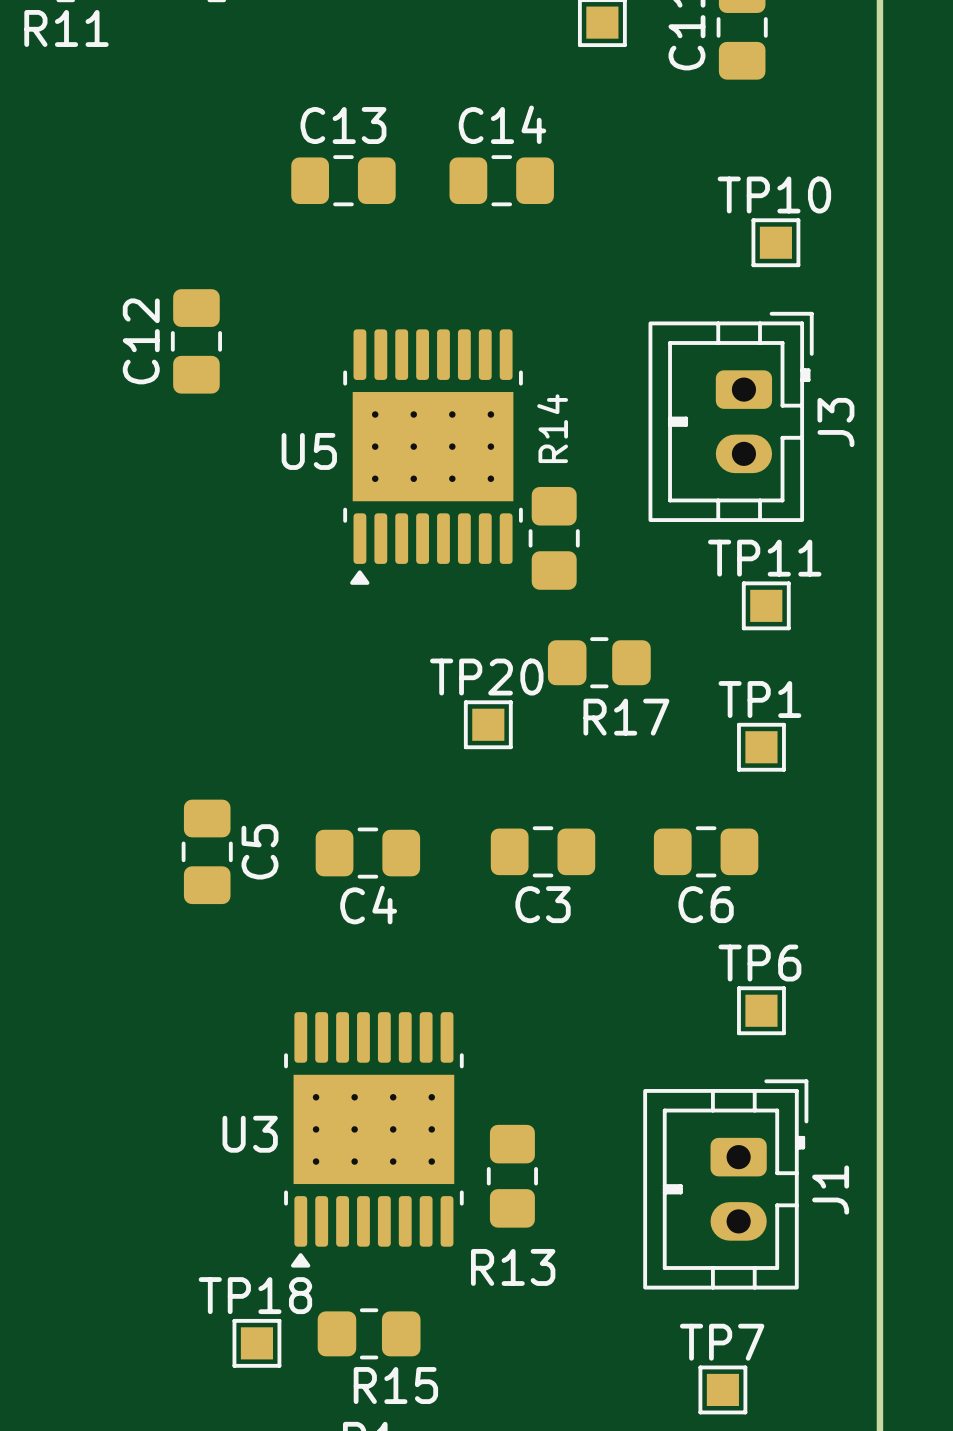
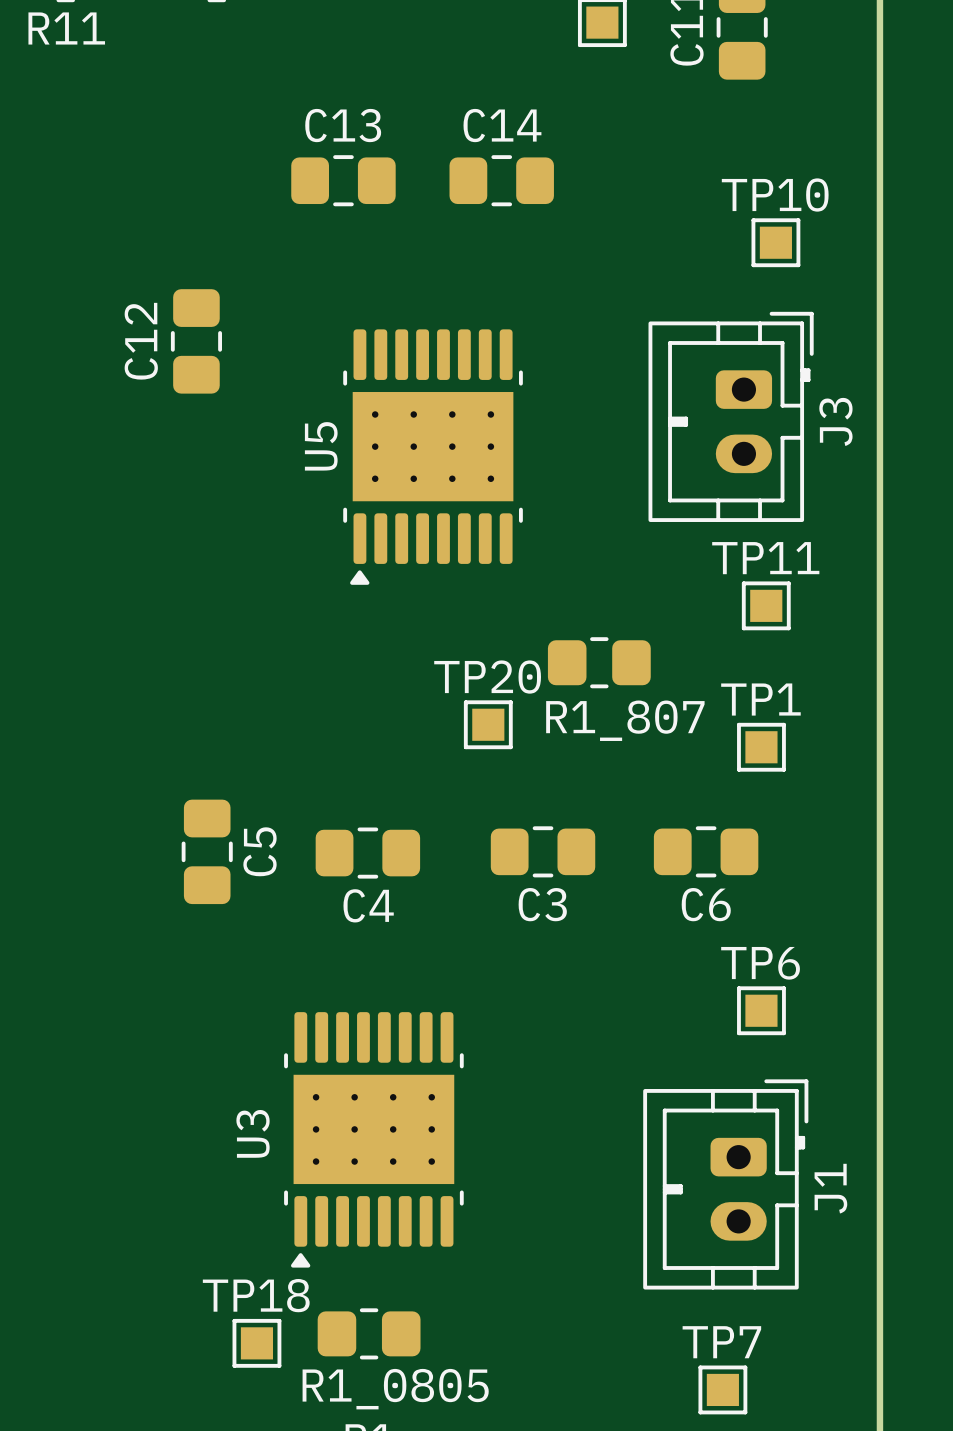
U5 name rotation: 0° (309, 451) -> 90° counterclockwise (321, 446)
R14: (554, 538) -> none
R17 name: R17 (626, 717) -> R1_807 (625, 720)
U3 name rotation: 0° (250, 1134) -> 90° counterclockwise (253, 1133)
R13: (512, 1176) -> none
R15 name: R15 (395, 1385) -> R1_0805 (395, 1389)

